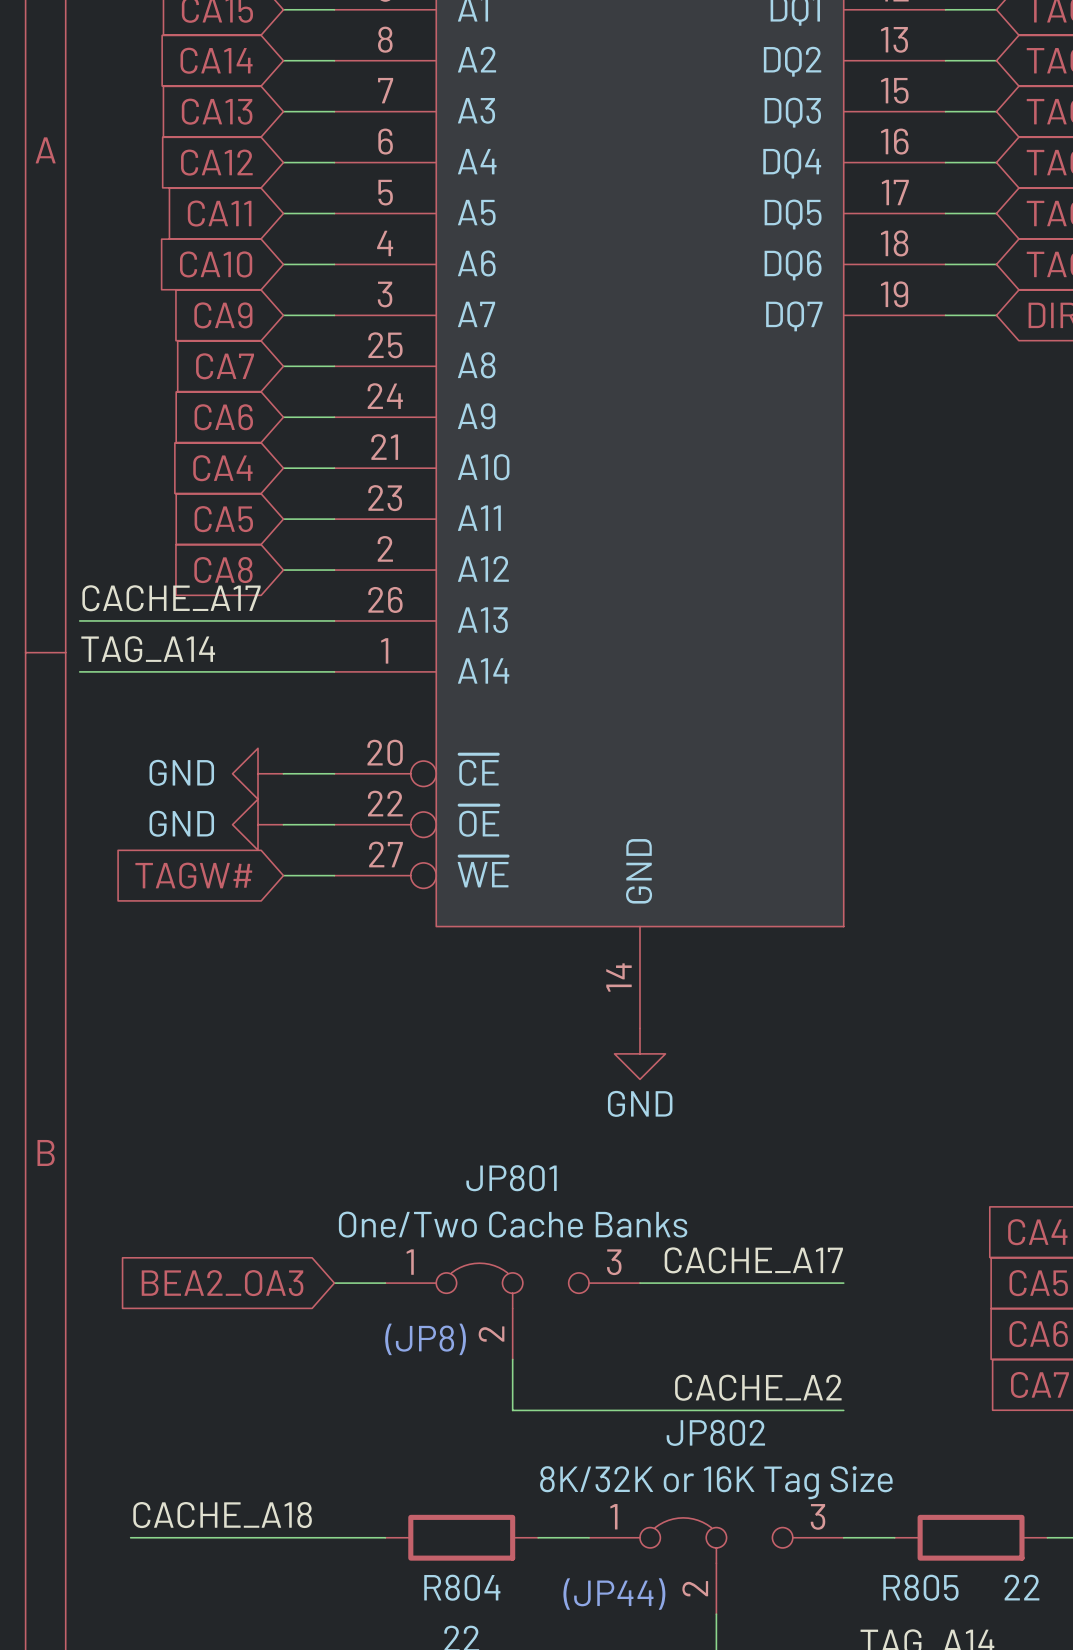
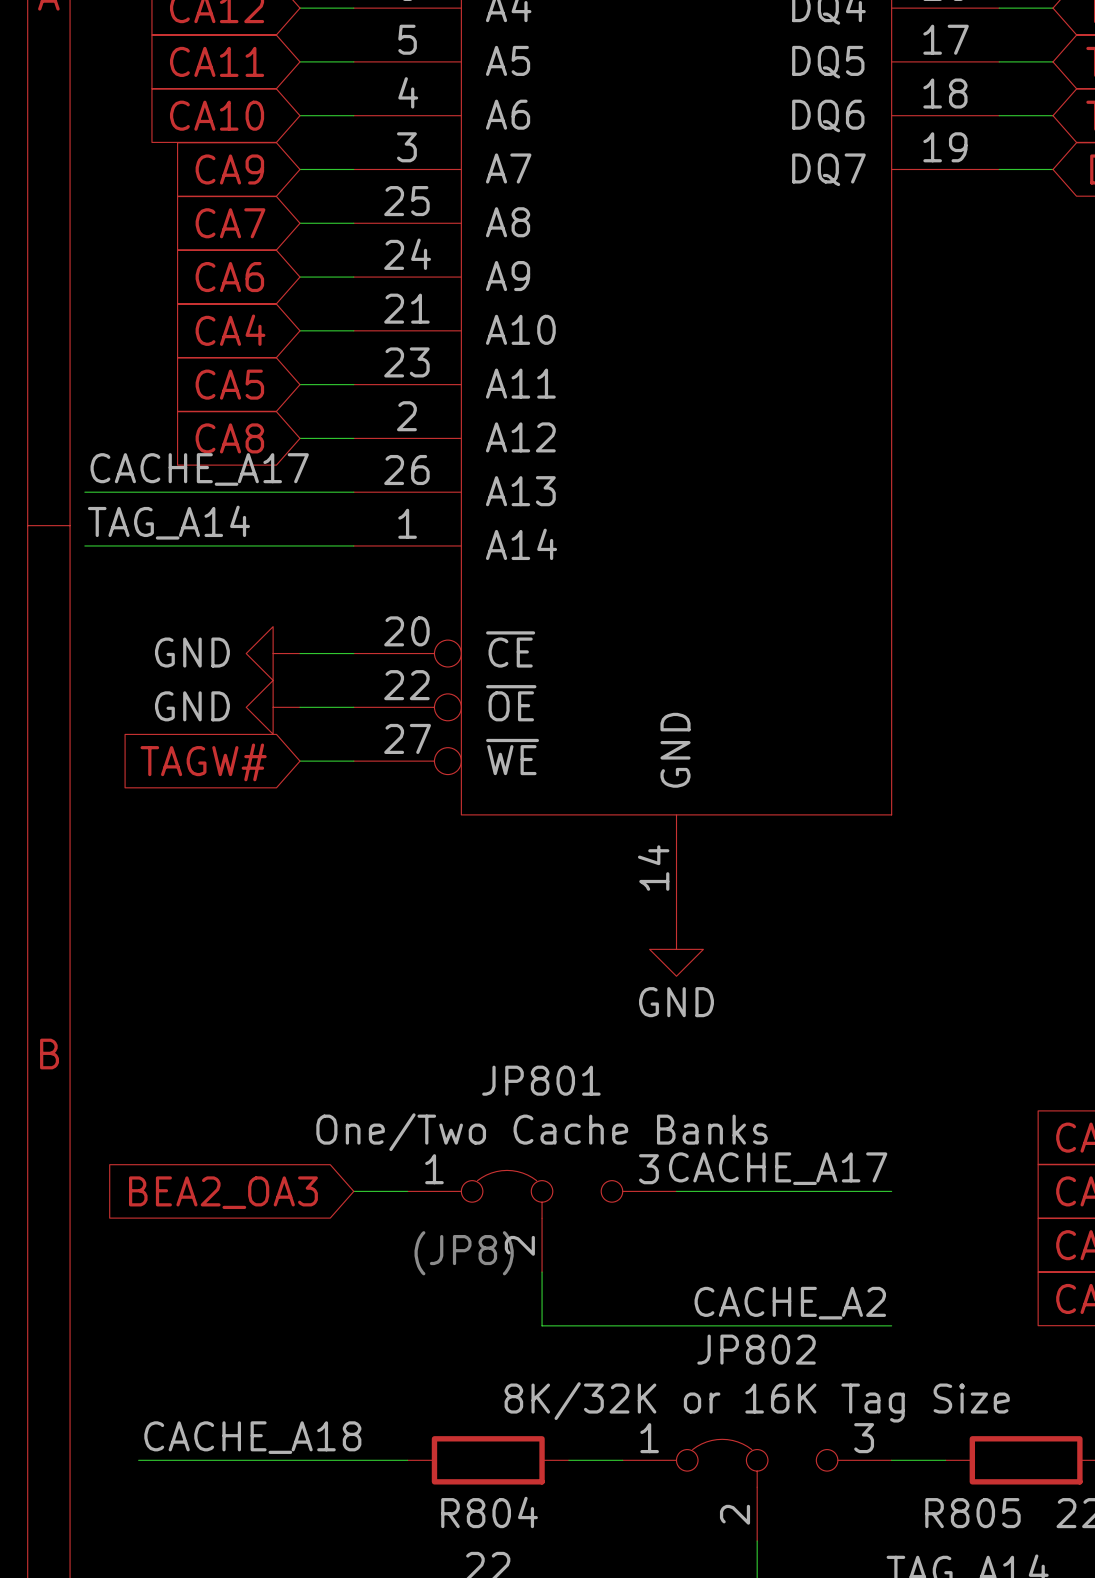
text: (JP44) (614, 1594) -> none

